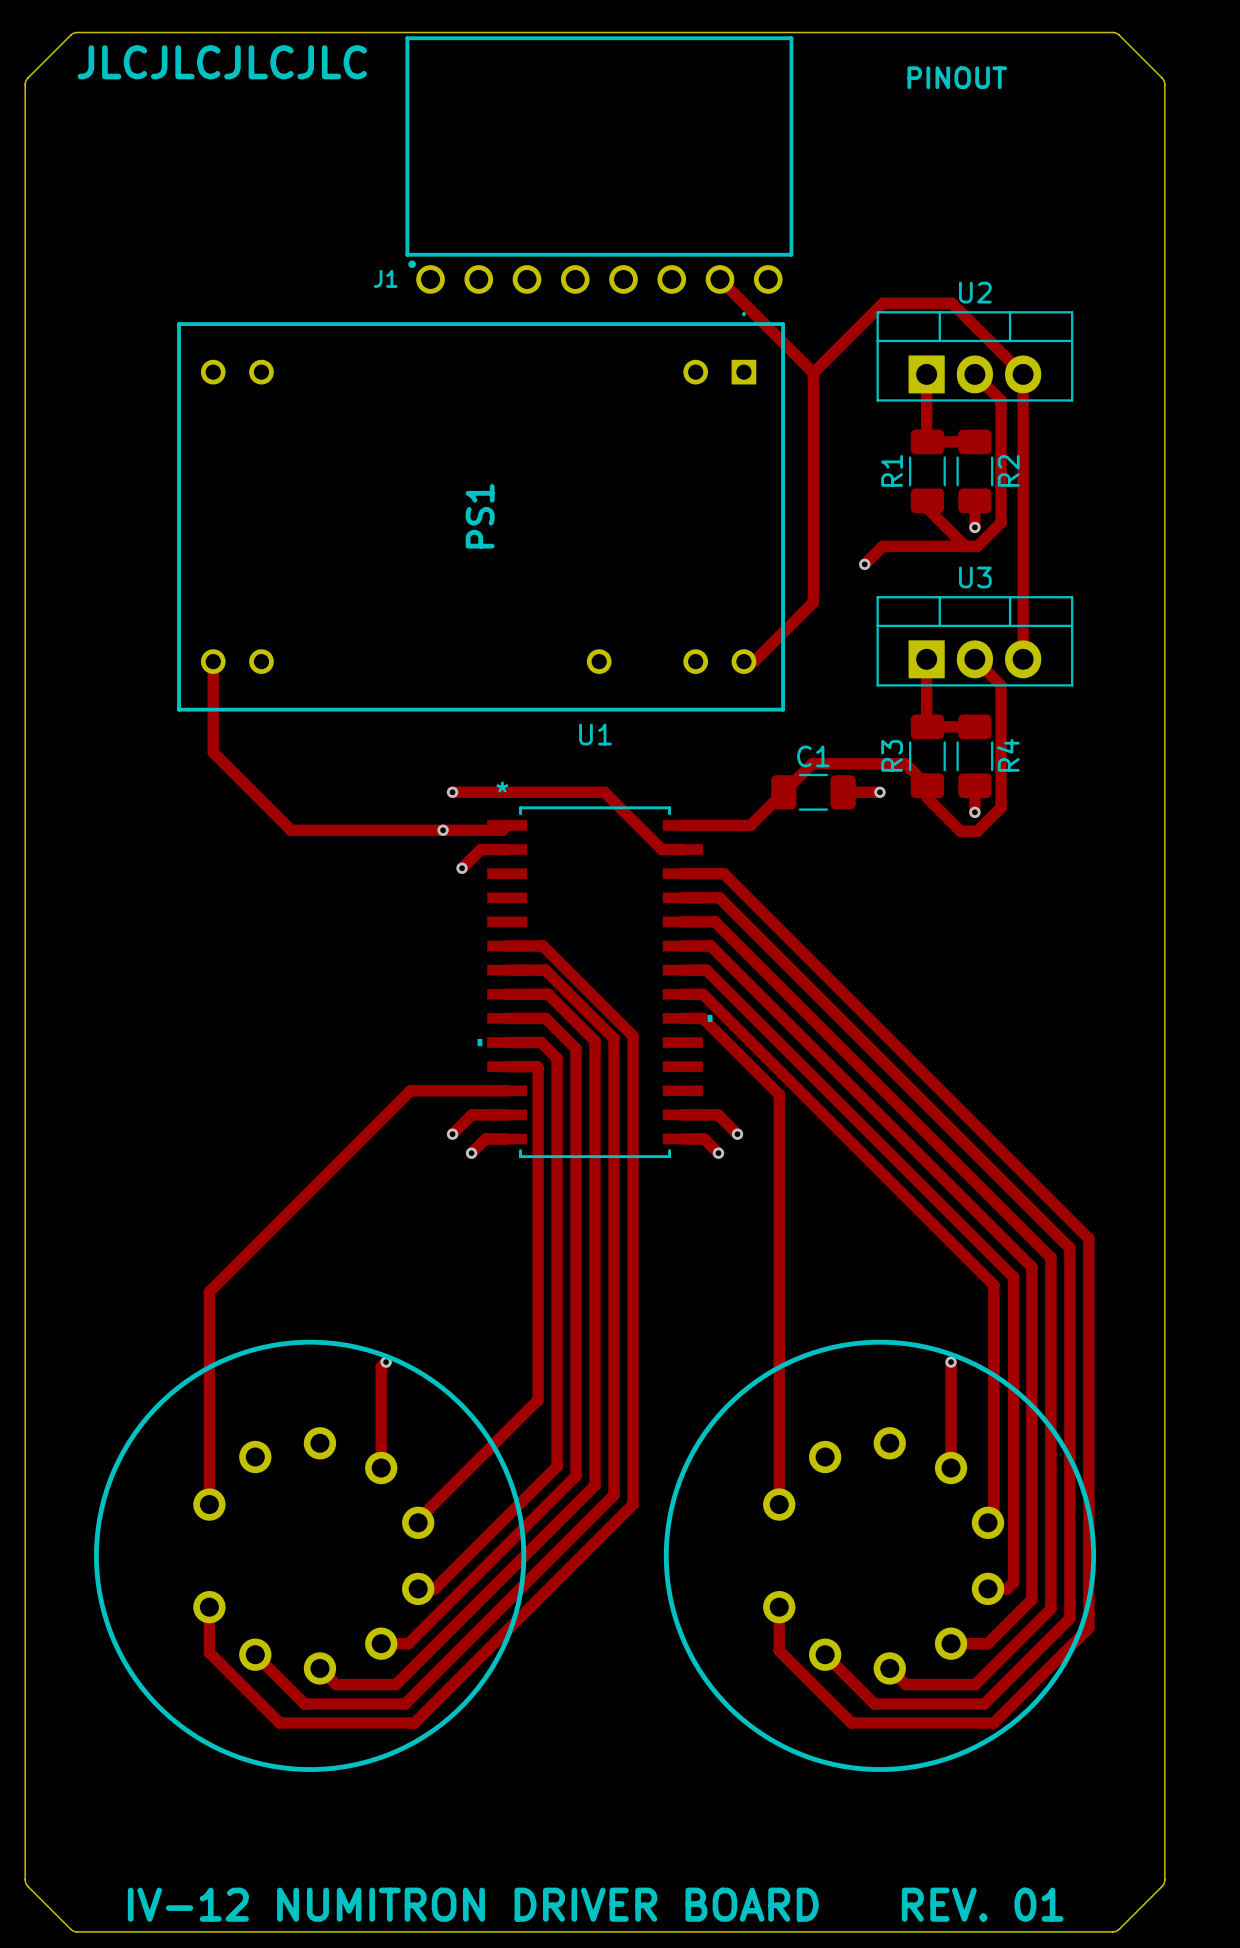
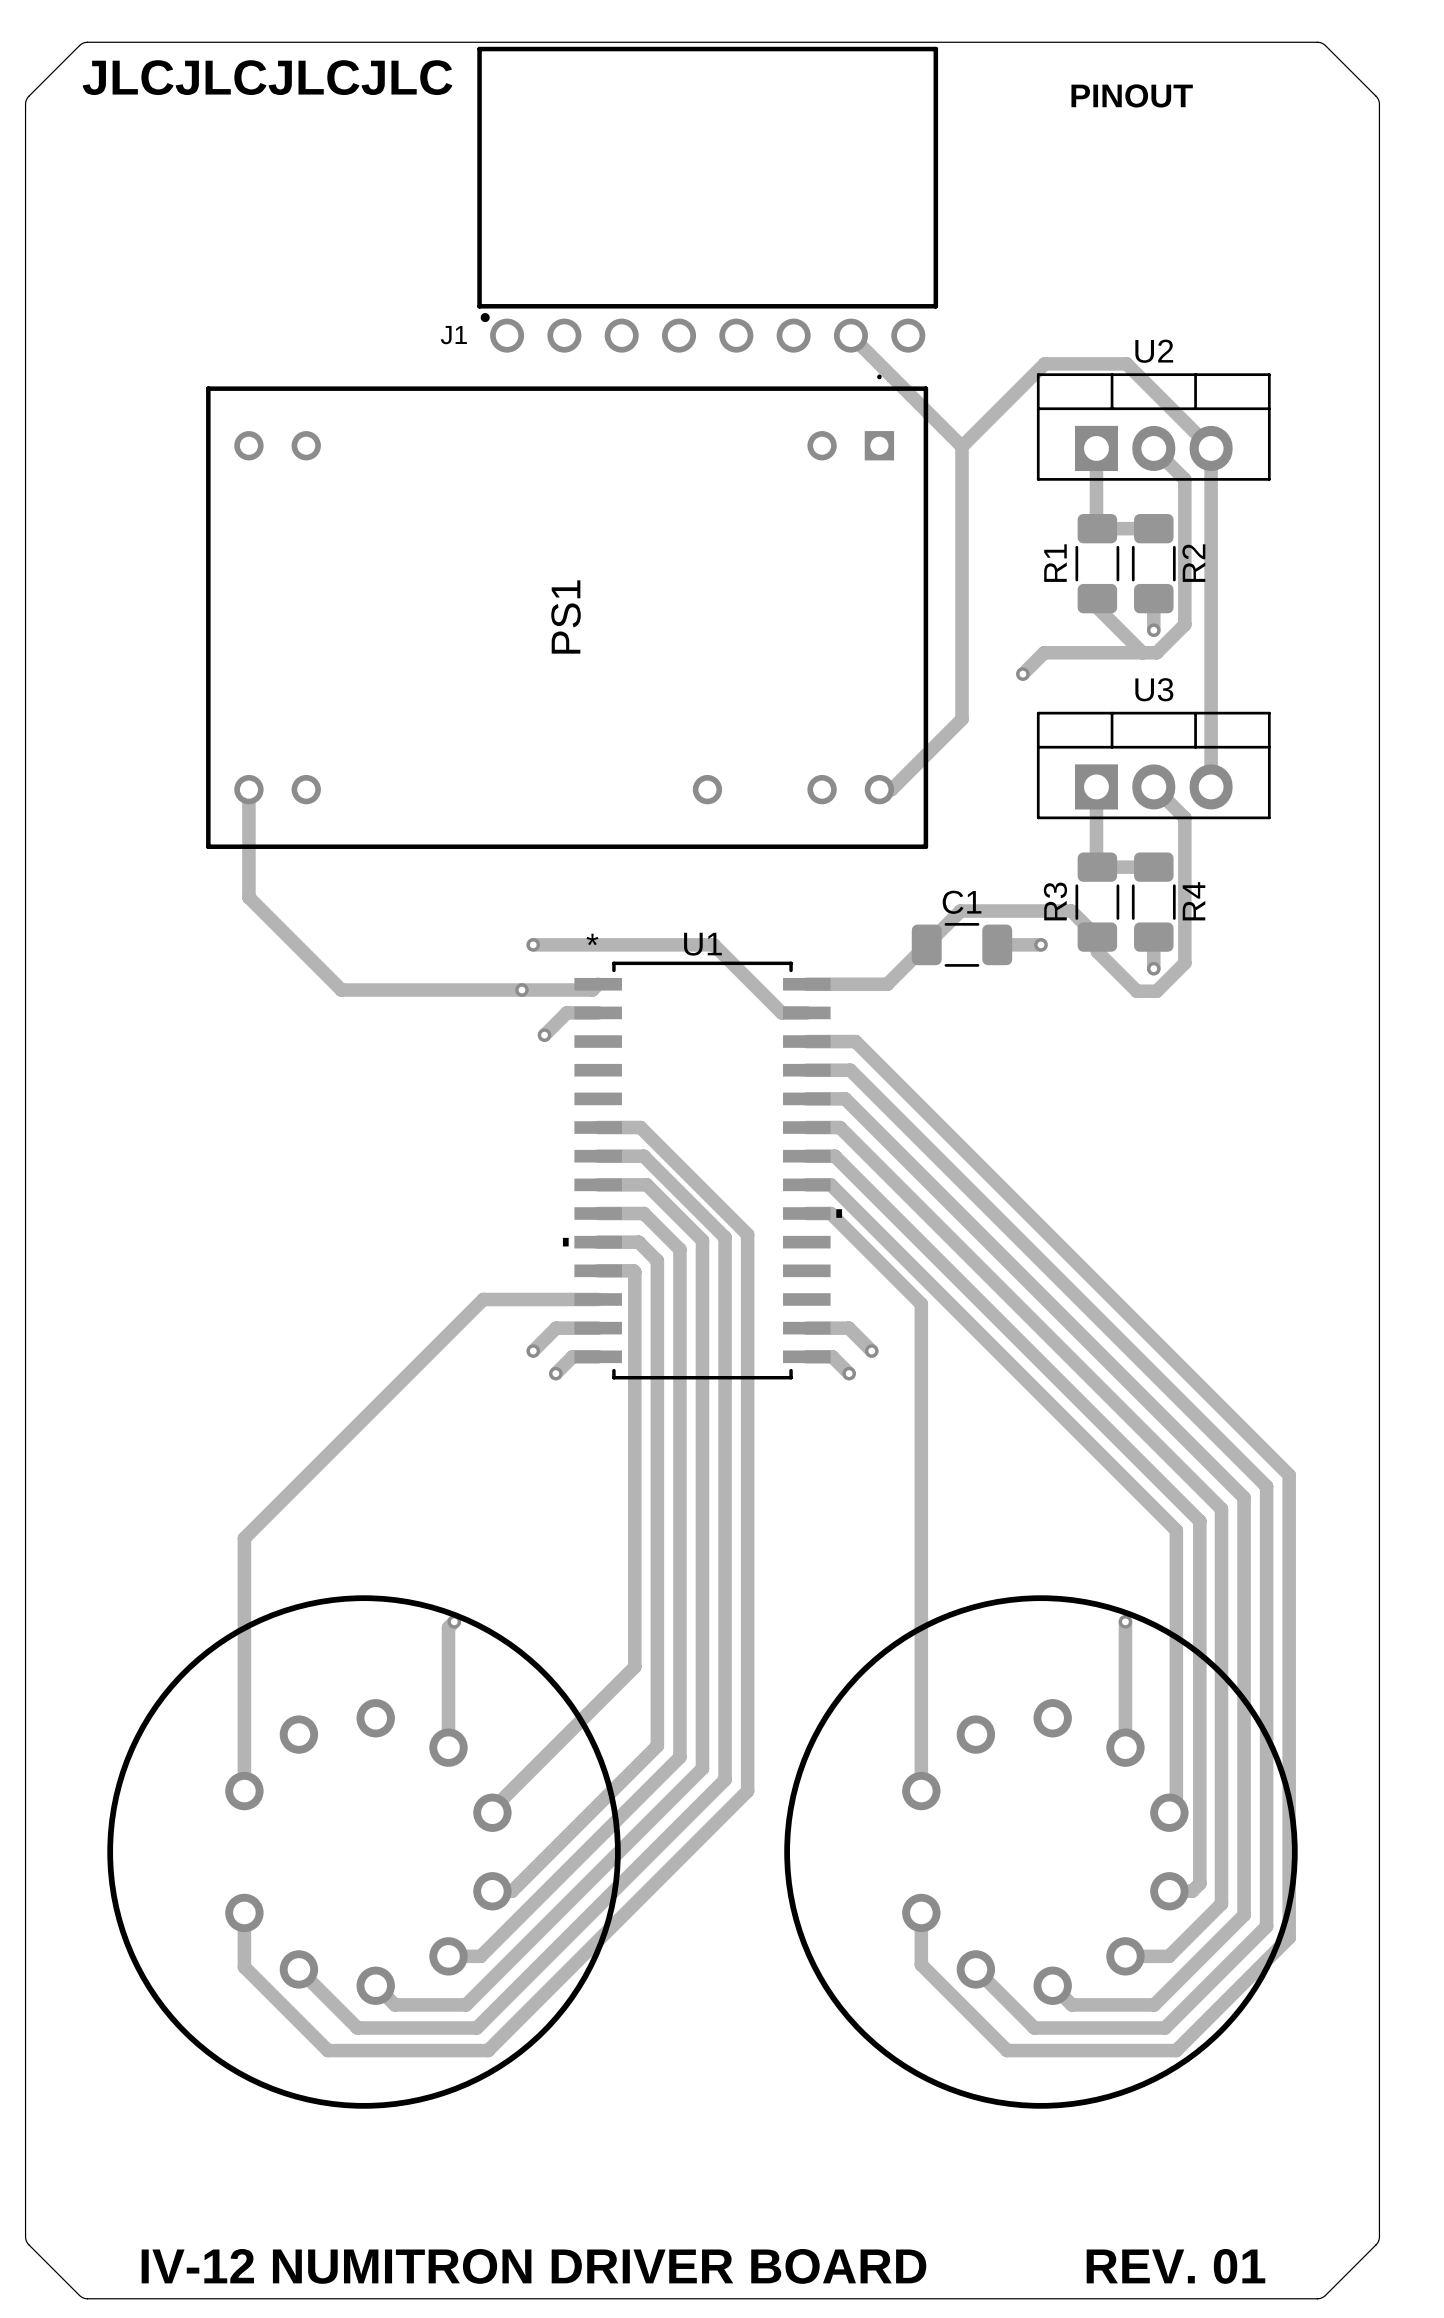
U1 name position: U1 (595, 734) -> U1 (702, 944)

